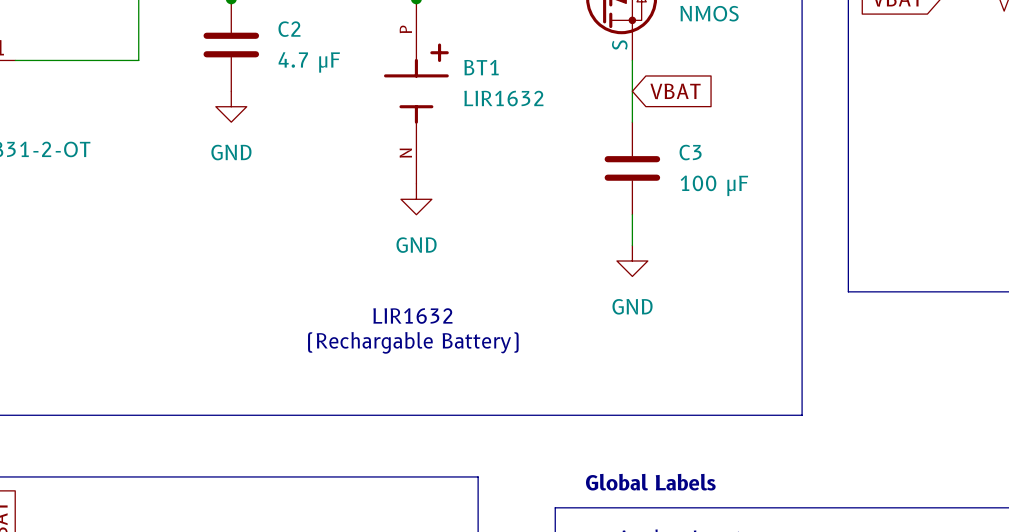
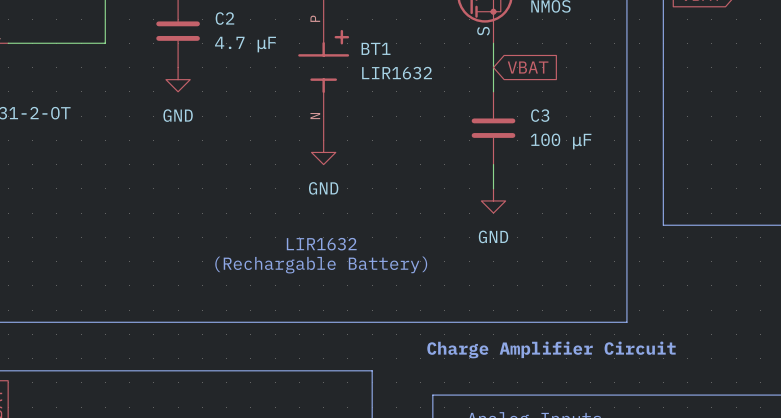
text: none -> Charge Amplifier Circuit (551, 349)
text: Global Labels (650, 482) -> none

